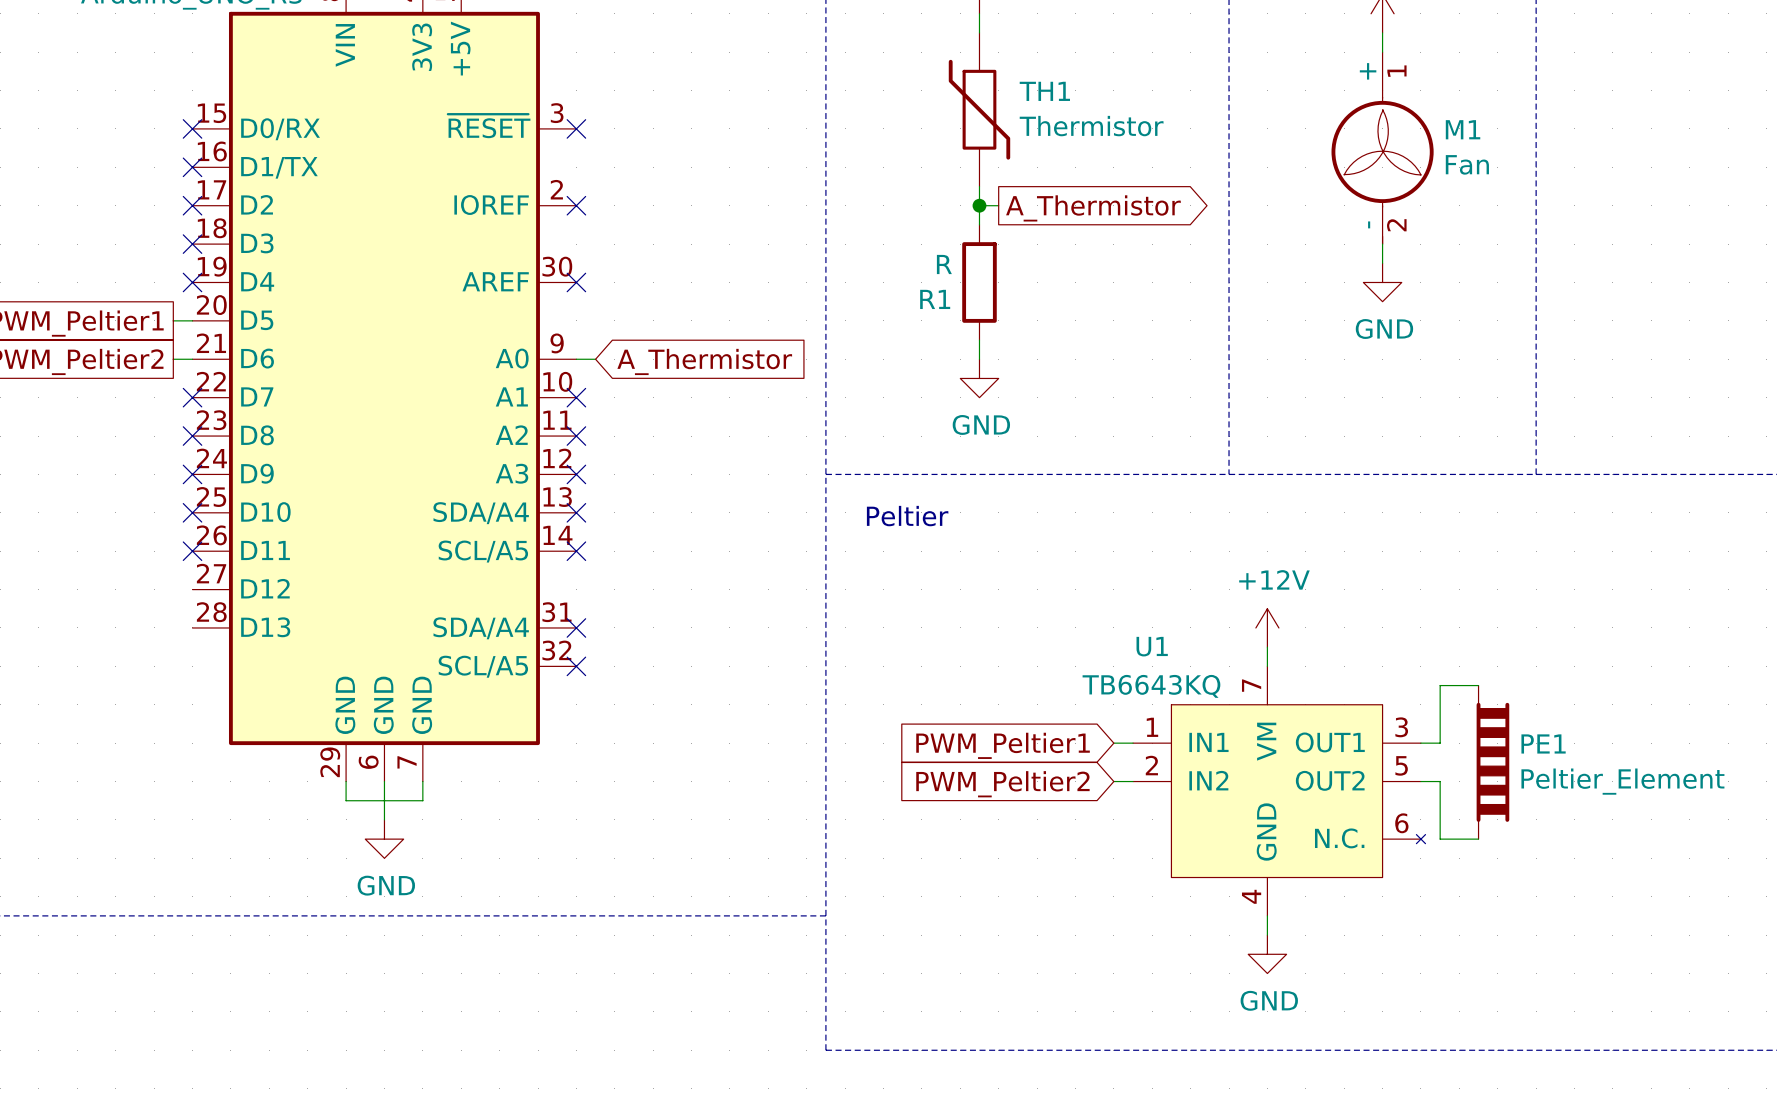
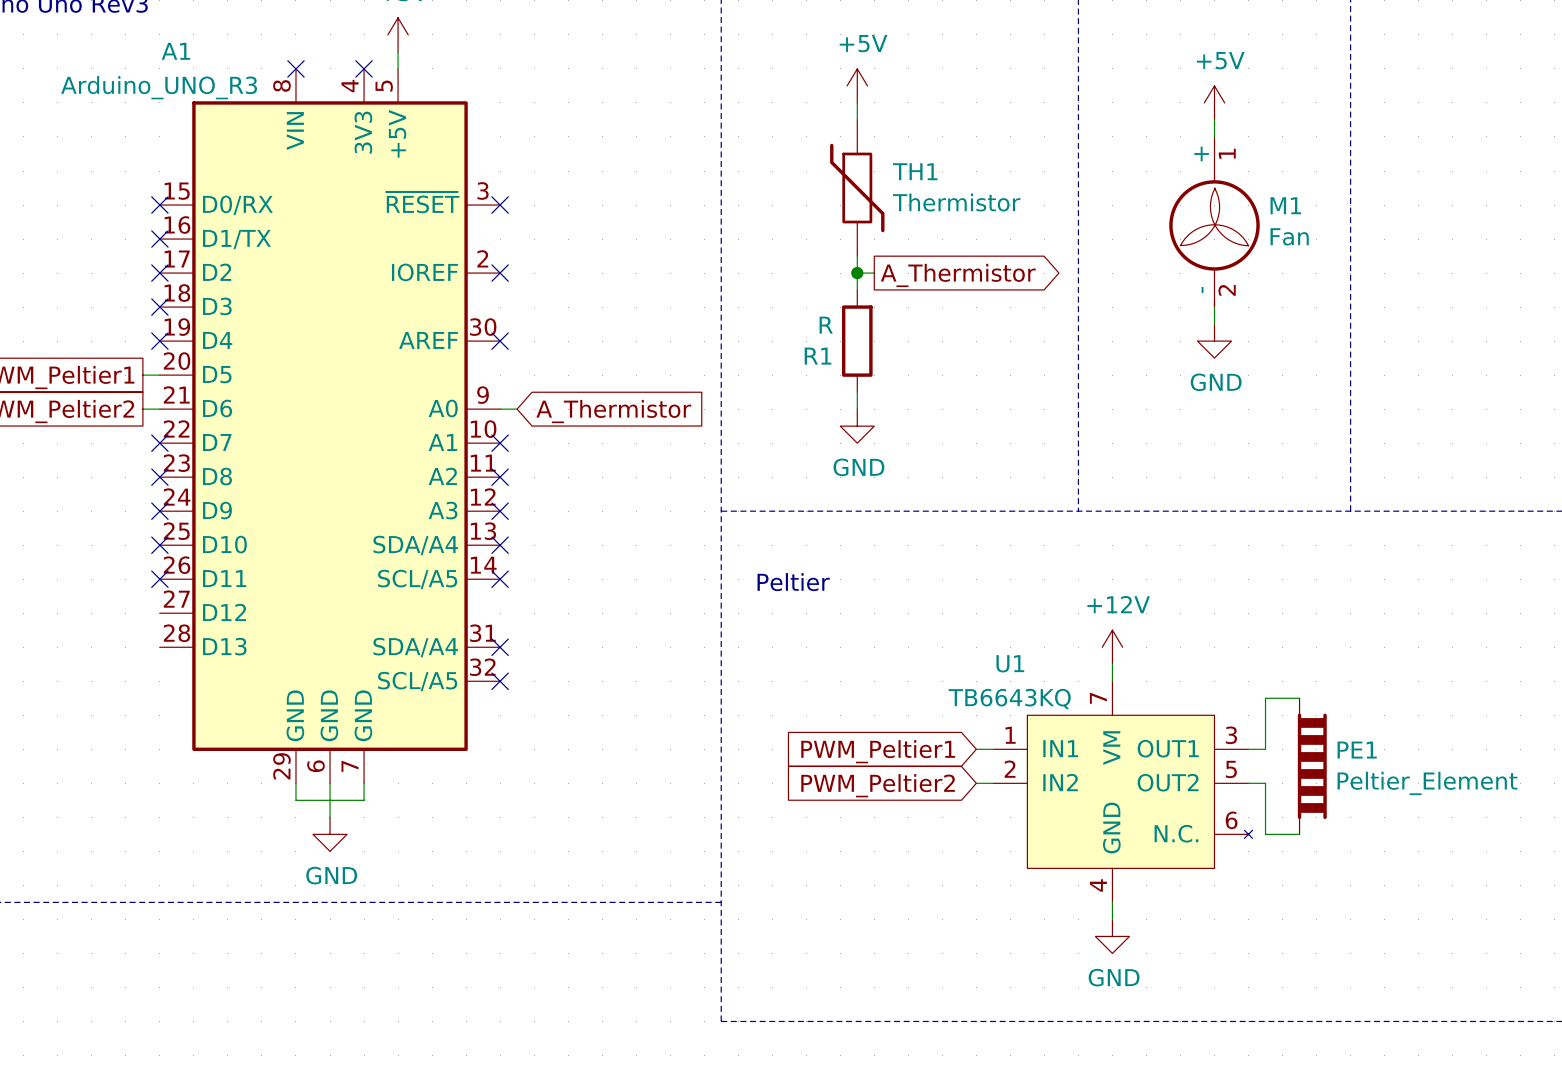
text position: Peltier (907, 516) -> Peltier (793, 582)

